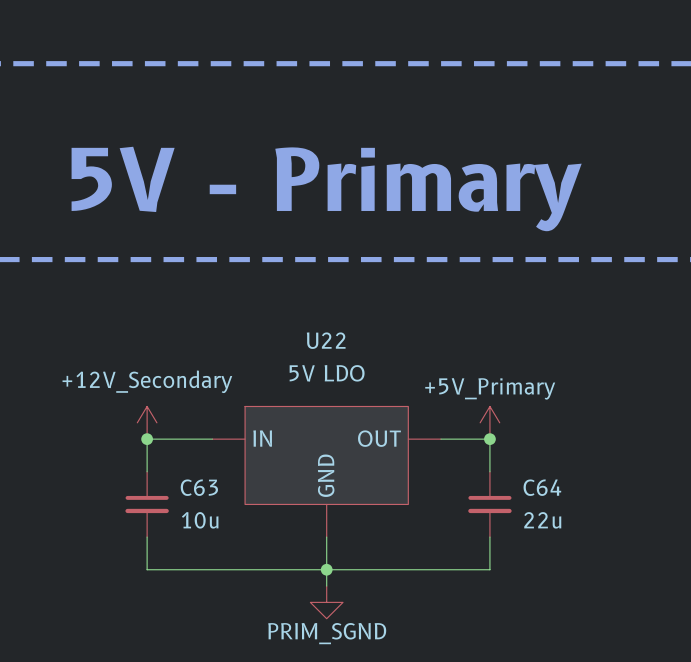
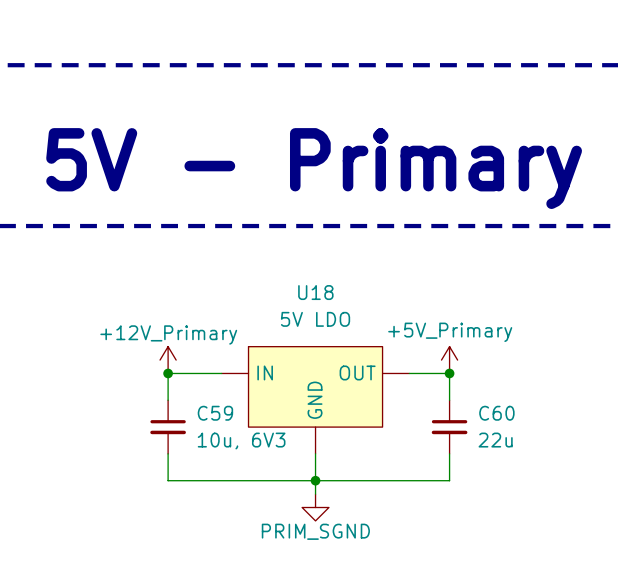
U22 name: U22 (326, 340) -> U18 (315, 292)
power symbol: +12V_Secondary (147, 422) -> +12V_Primary (168, 360)
C63 name: C63 (199, 487) -> C59 (215, 413)
C64 name: C64 (542, 487) -> C60 (496, 413)
C63 value: 10u (200, 520) -> 10u, 6V3 (241, 441)

